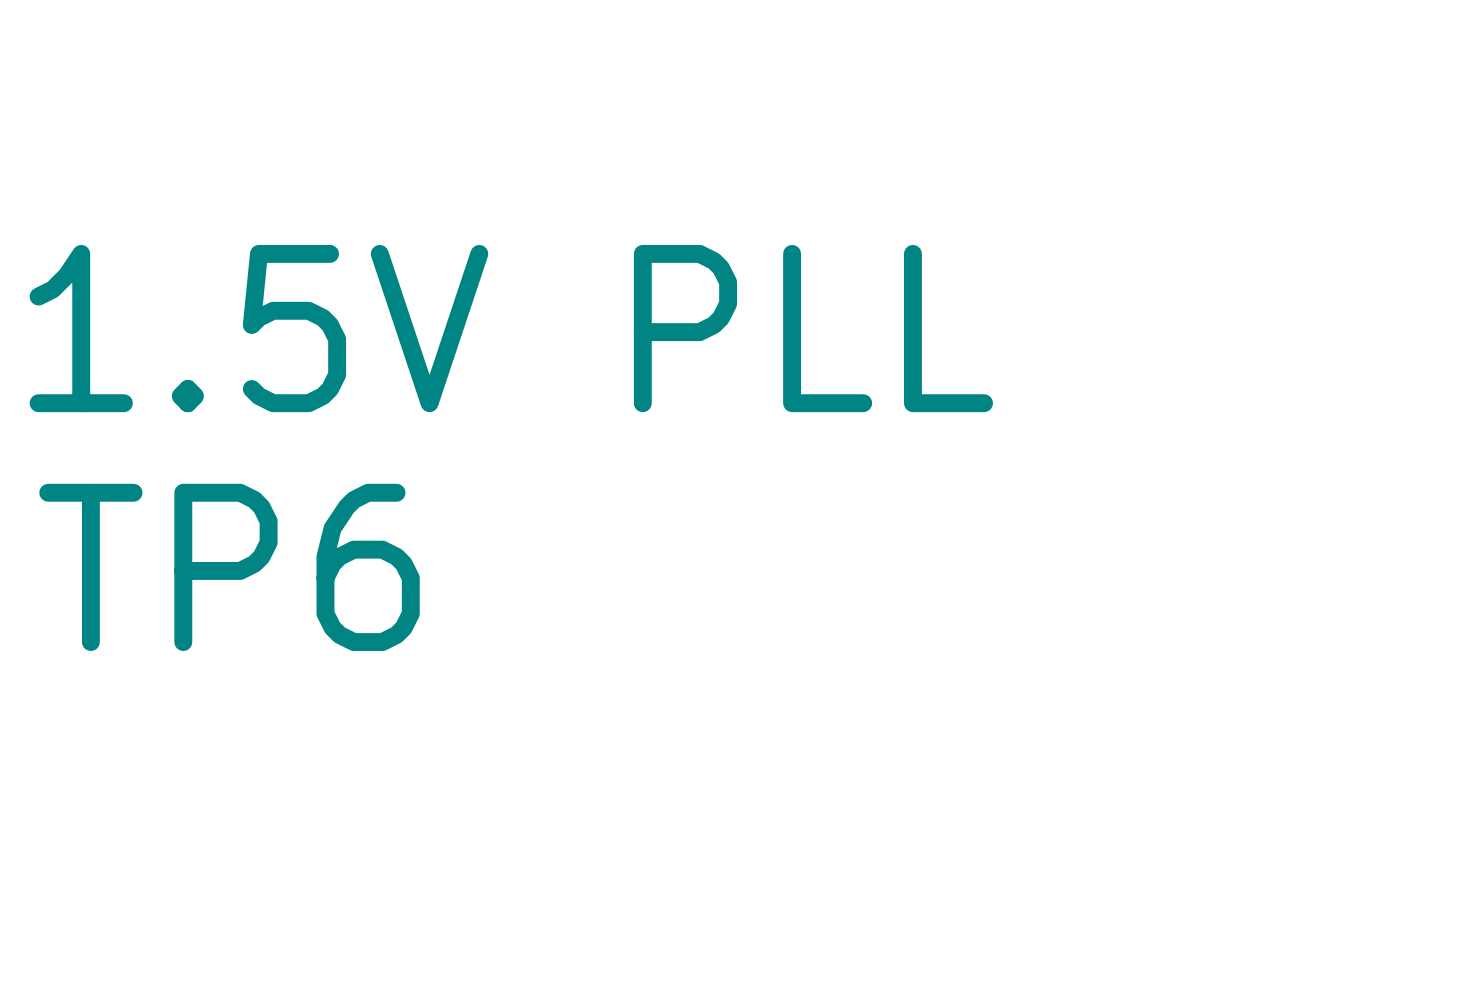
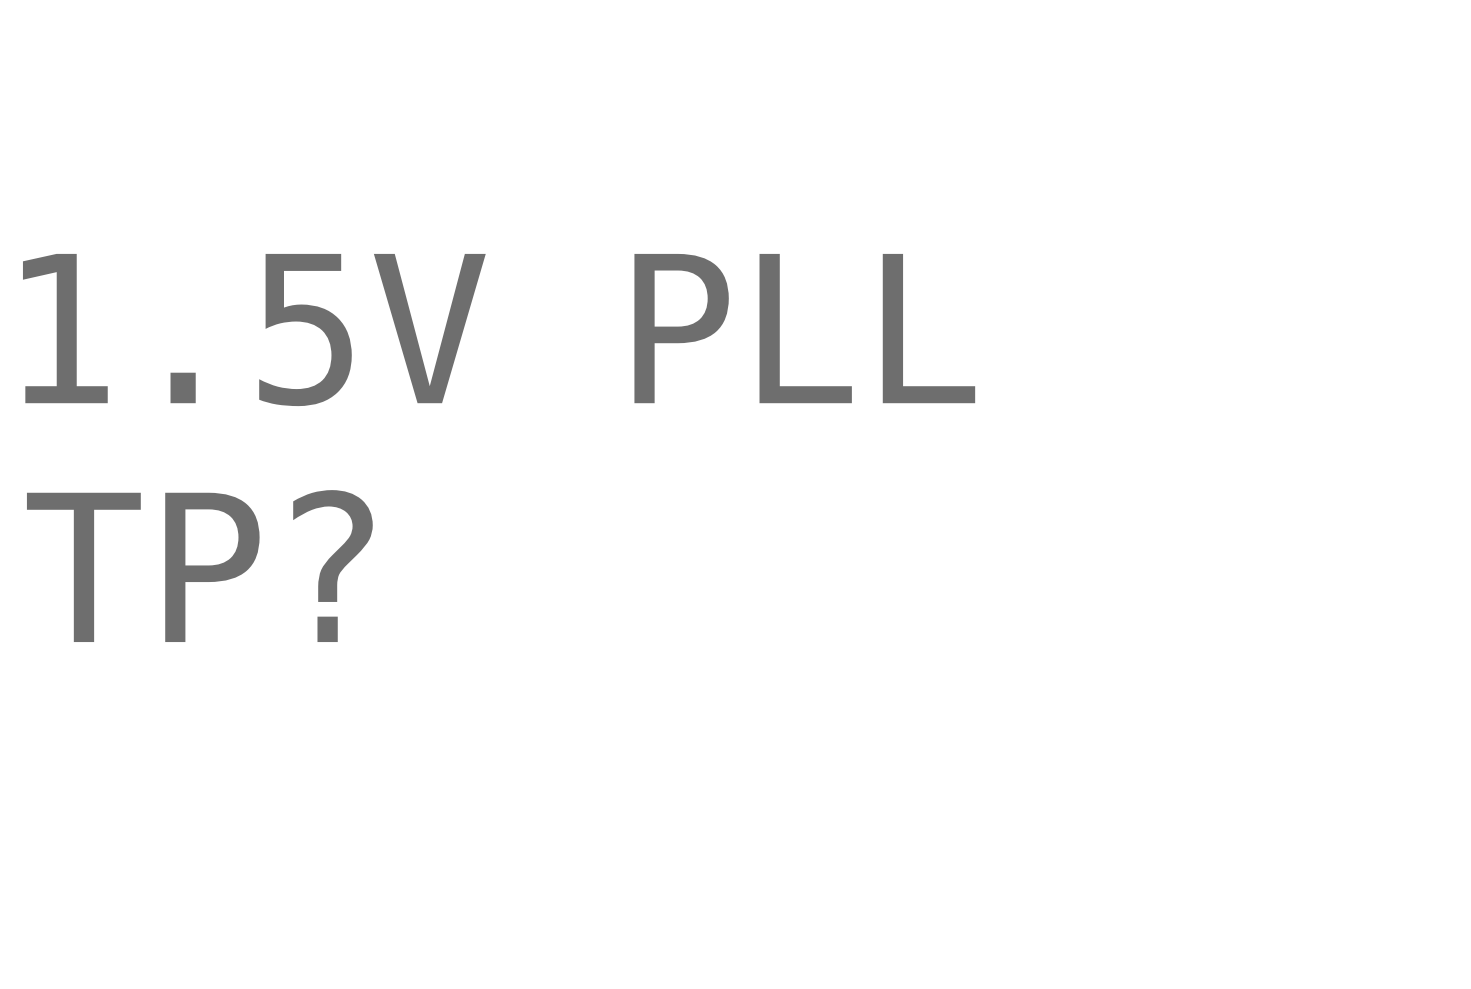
TP6 name: TP6 (229, 567) -> TP? (199, 566)

